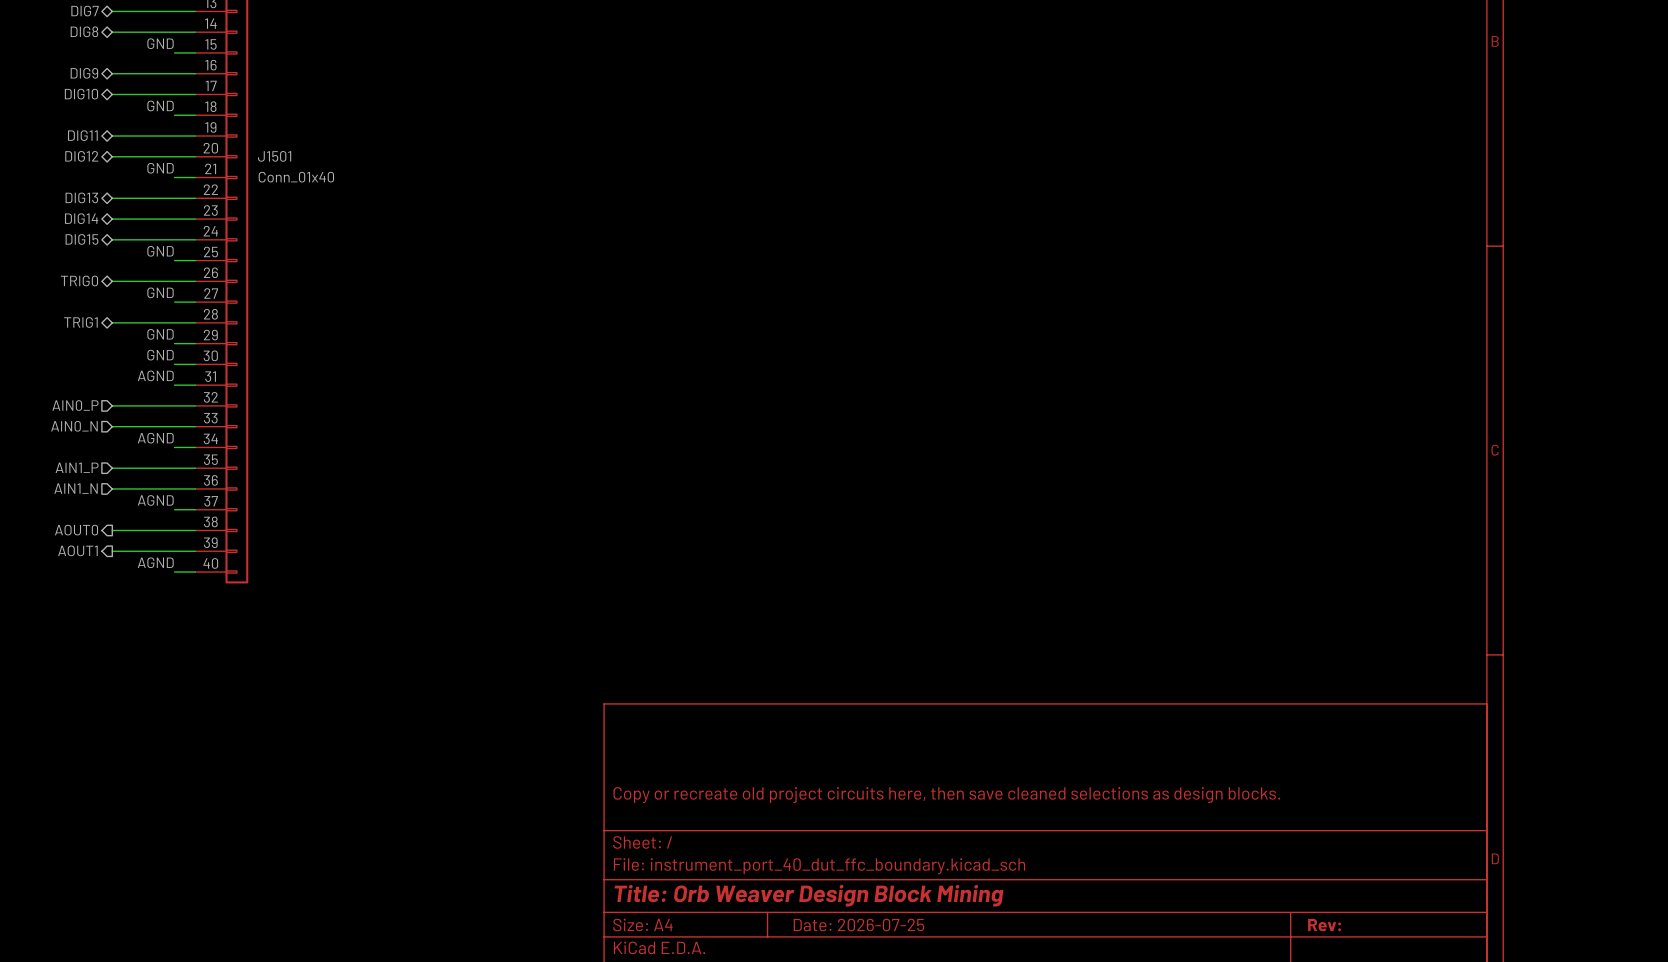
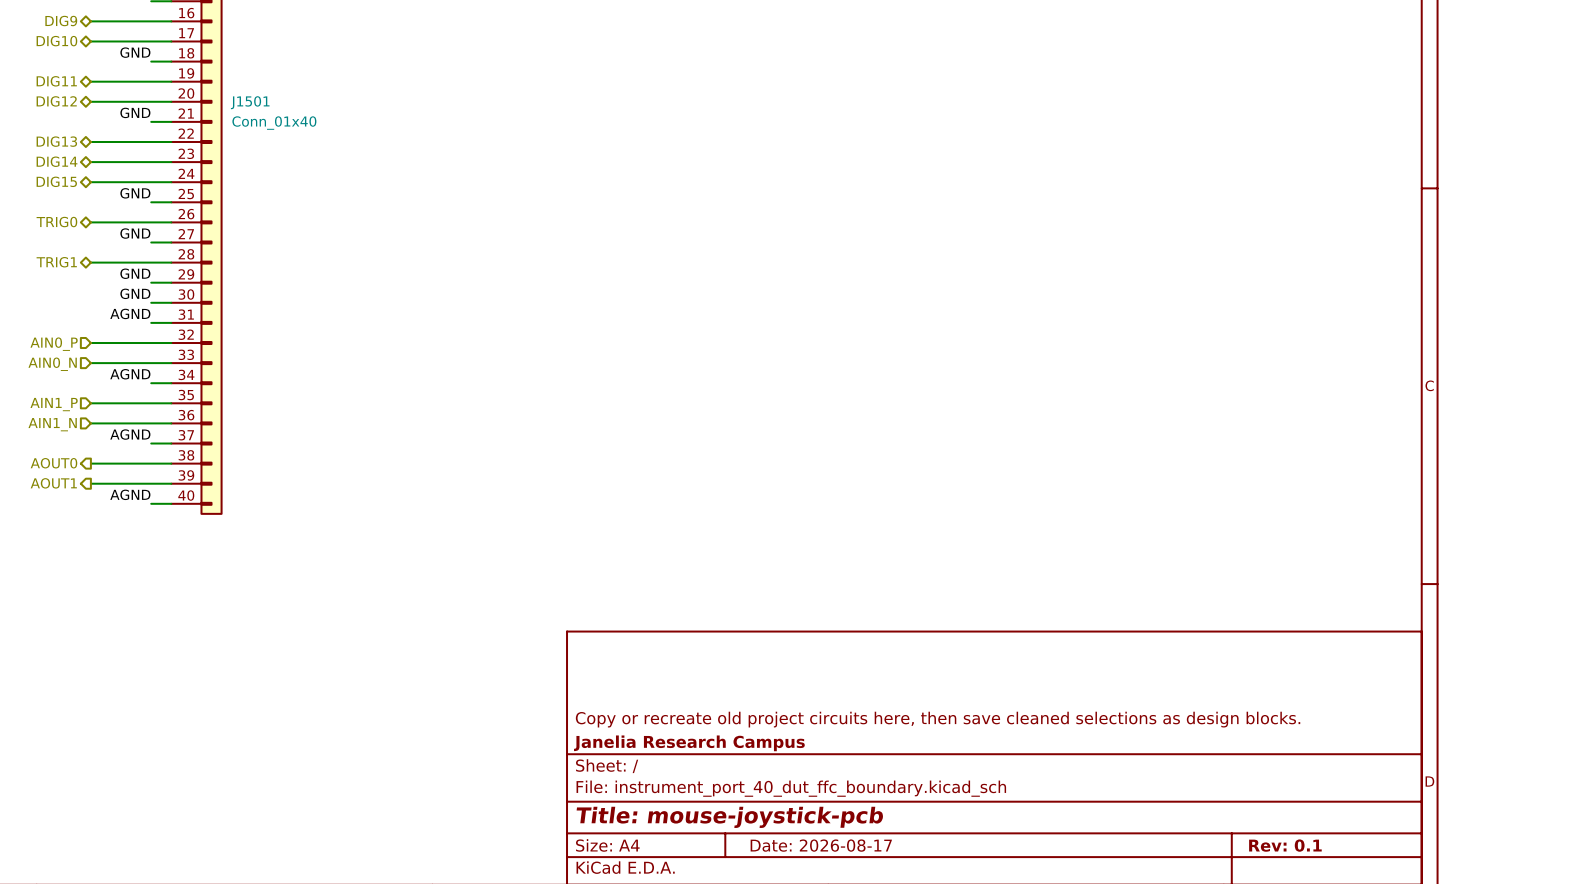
title block: none -> Janelia Research Campus (689, 743)
title block: Title: Orb Weaver Design Block Mining (808, 895) -> Title: mouse-joystick-pcb (729, 817)
title block: Date: 2026-07-25 (858, 925) -> Date: 2026-08-17 (821, 845)
title block: Rev: (1324, 925) -> Rev: 0.1 (1285, 845)

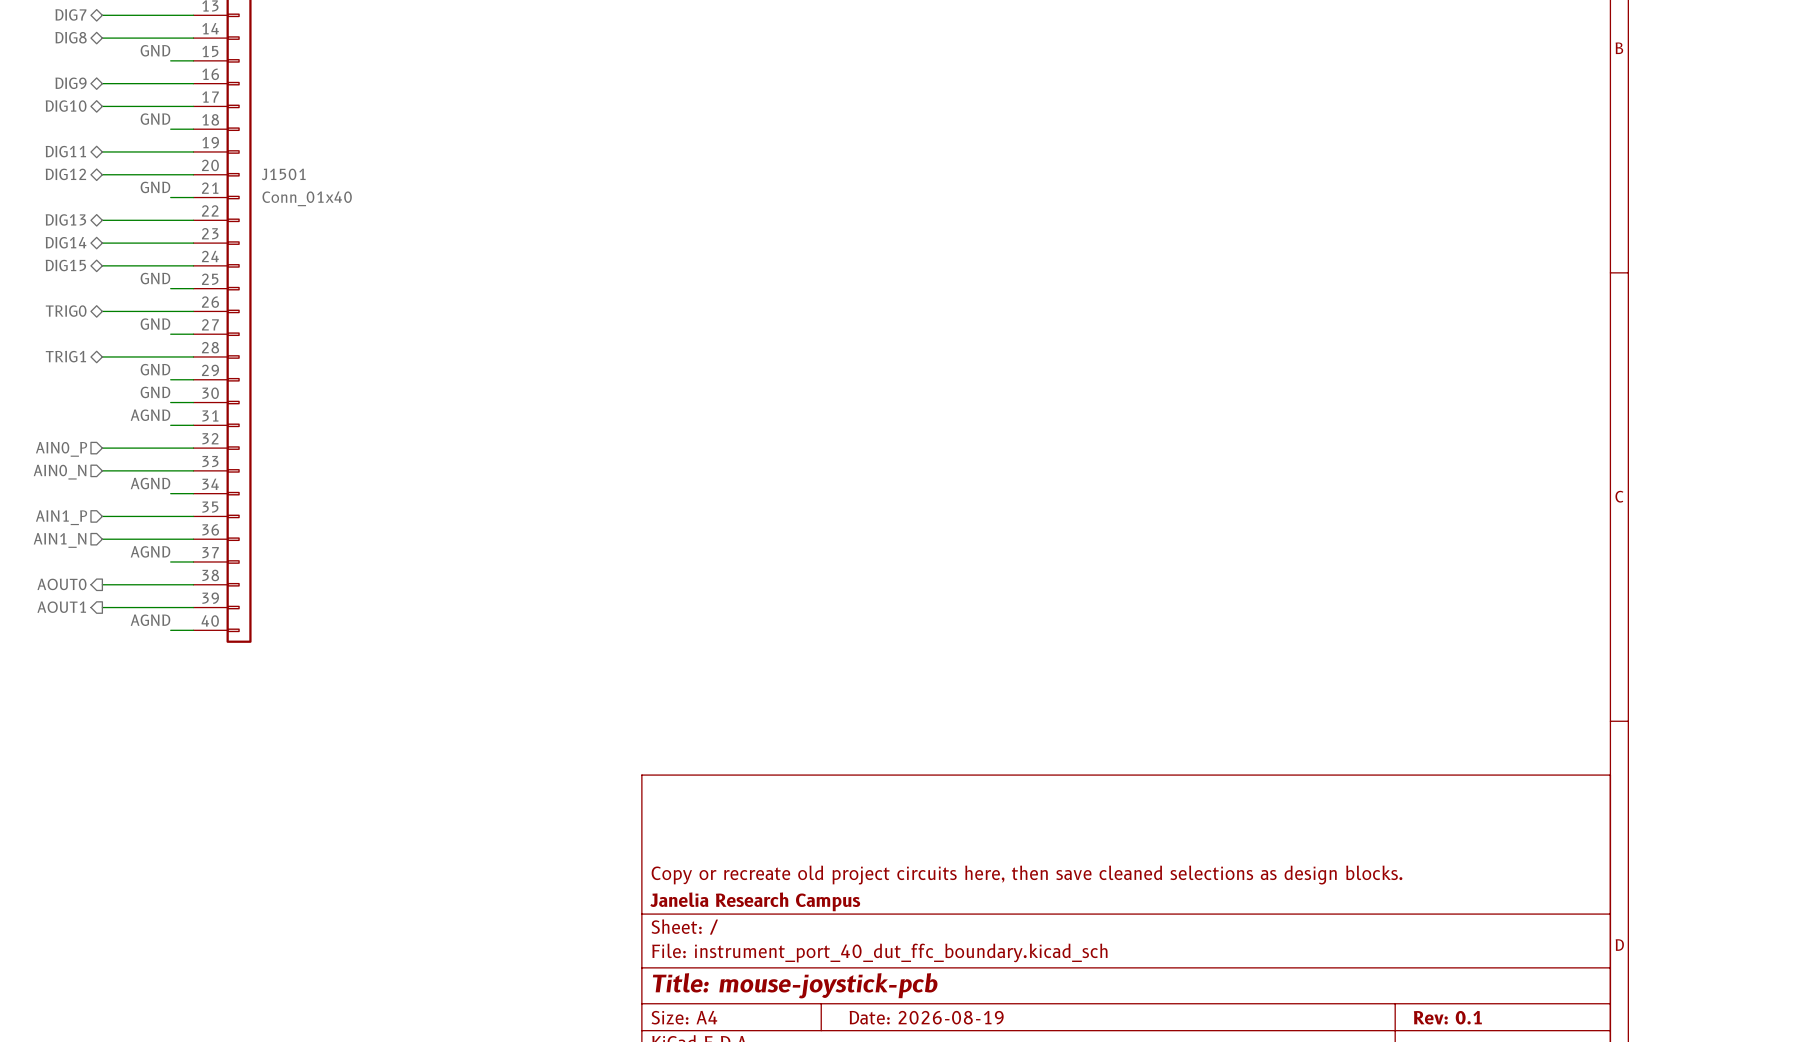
title block: Date: 2026-08-17 (821, 845) -> Date: 2026-08-19 (926, 1017)

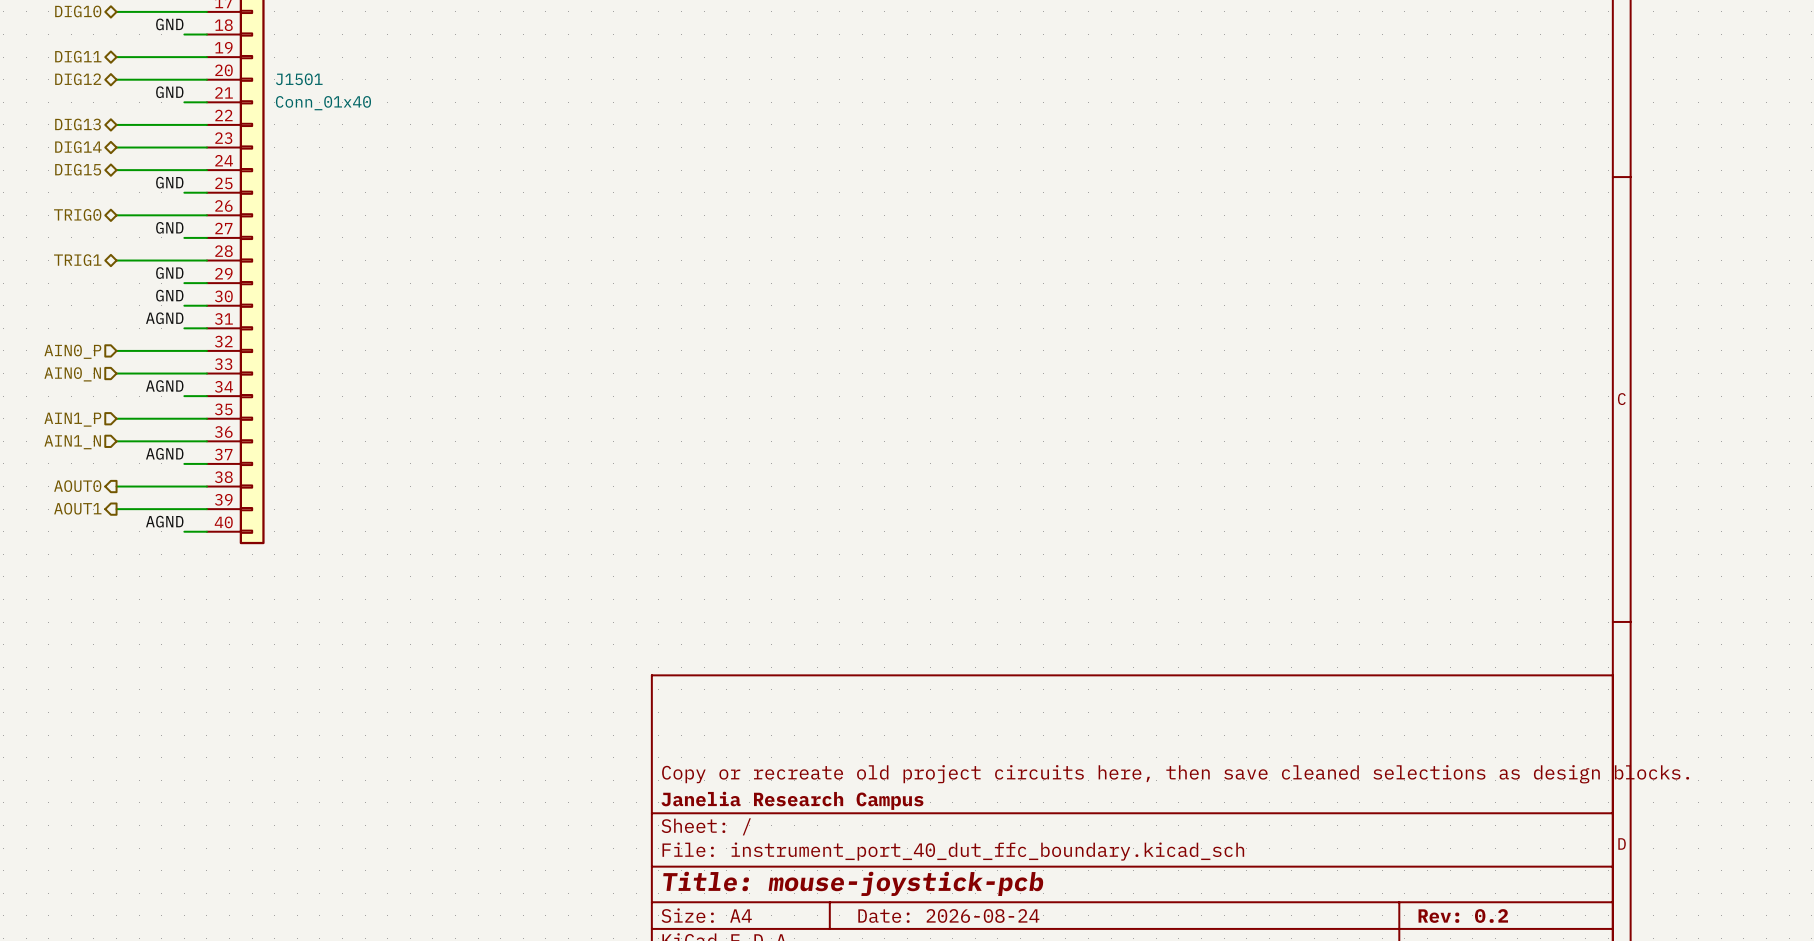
title block: Date: 2026-08-19 (926, 1017) -> Date: 2026-08-24 (948, 915)
title block: Rev: 0.1 (1447, 1017) -> Rev: 0.2 (1463, 915)

